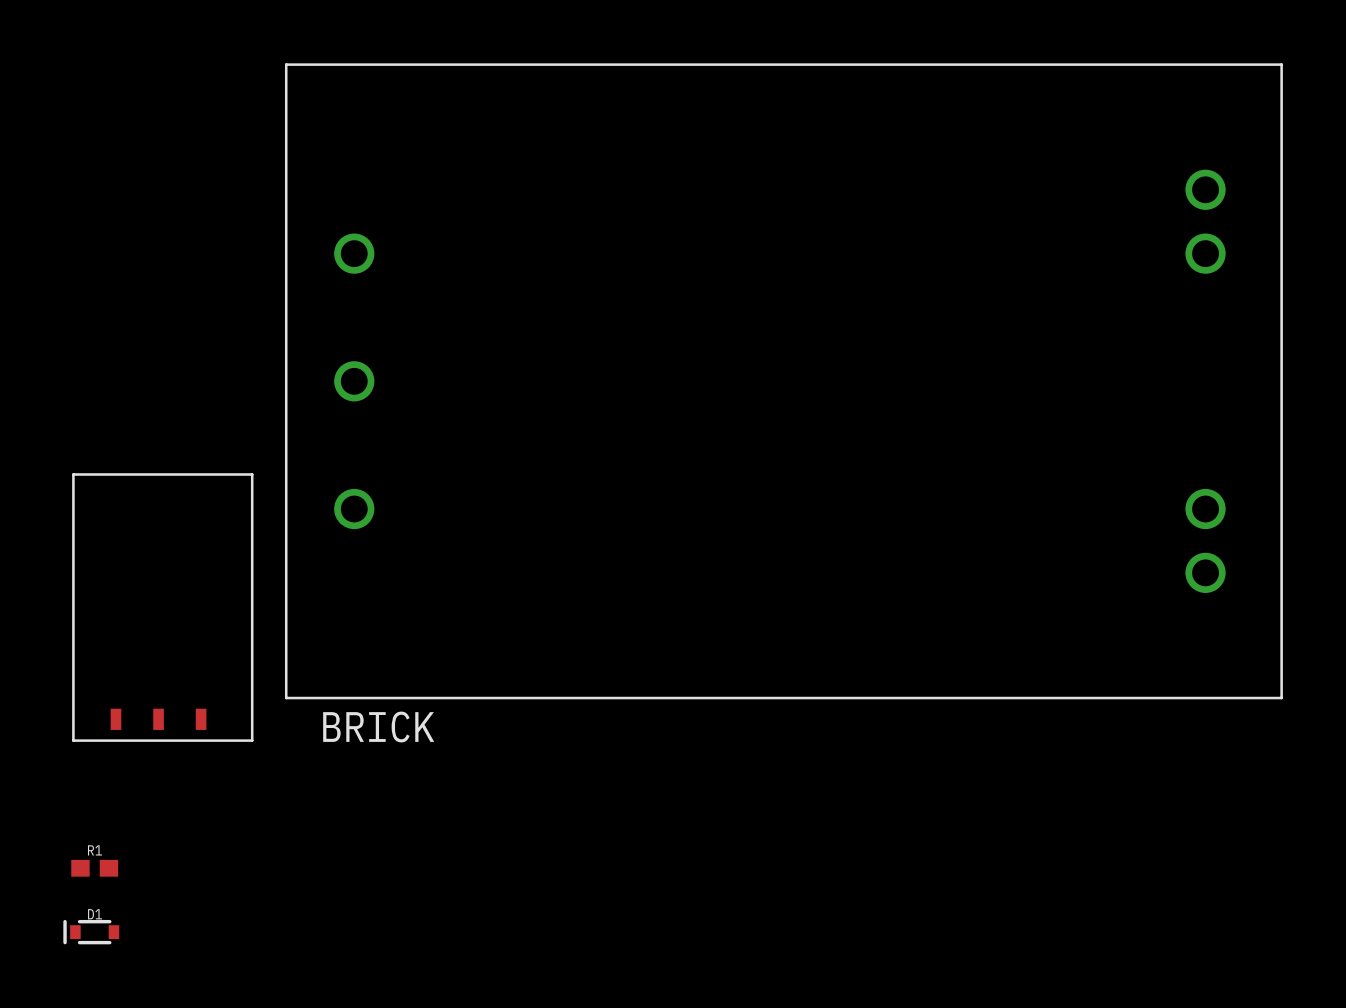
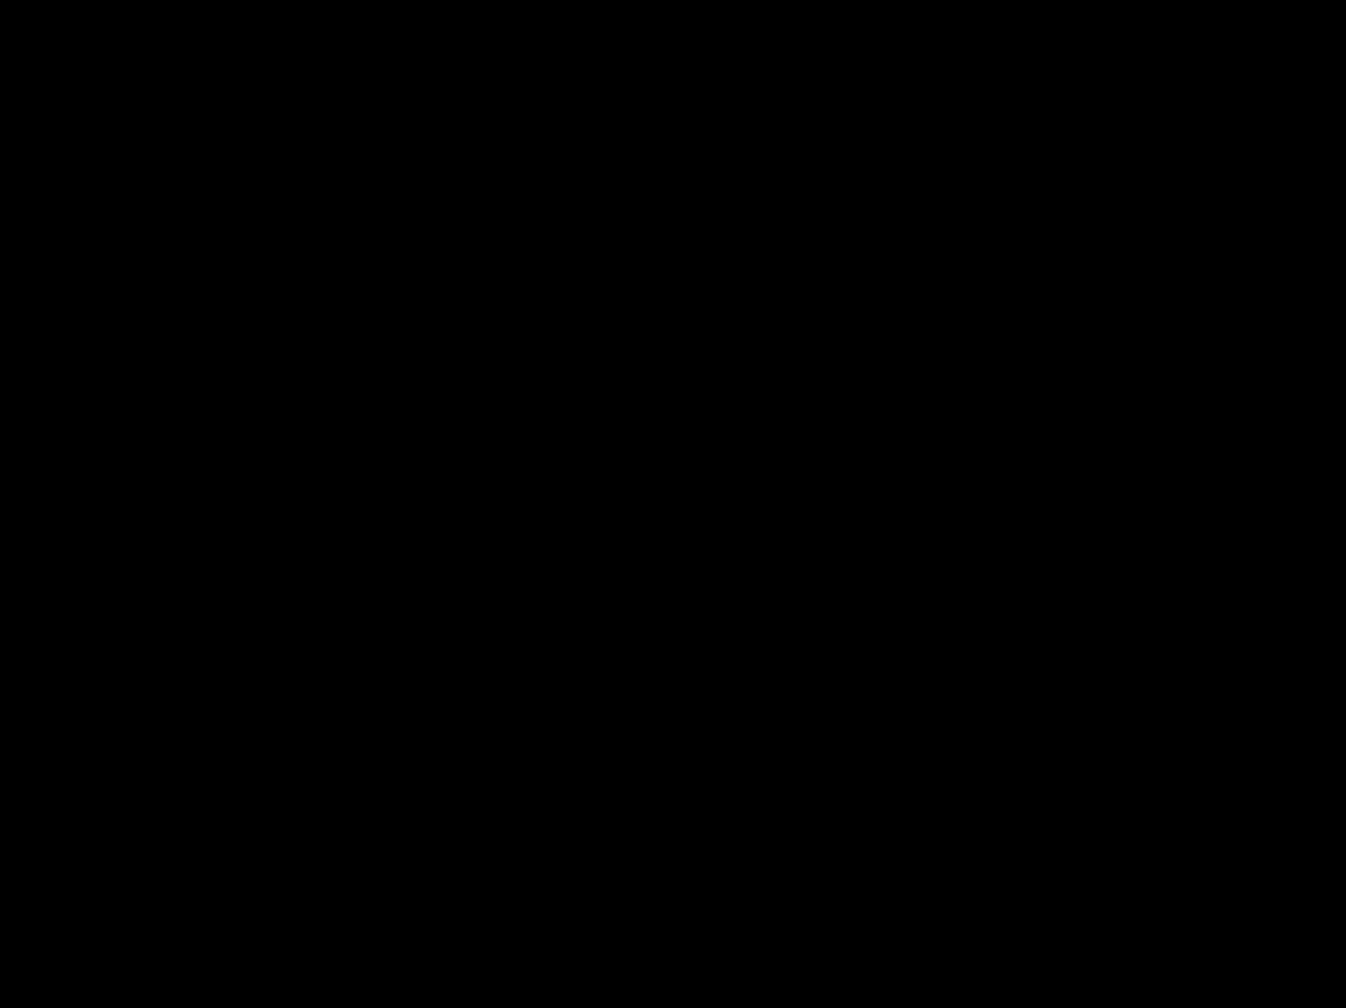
BRICK: (783, 381) -> none
part: (162, 607) -> none
R1: (94, 868) -> none
D1: (91, 932) -> none

